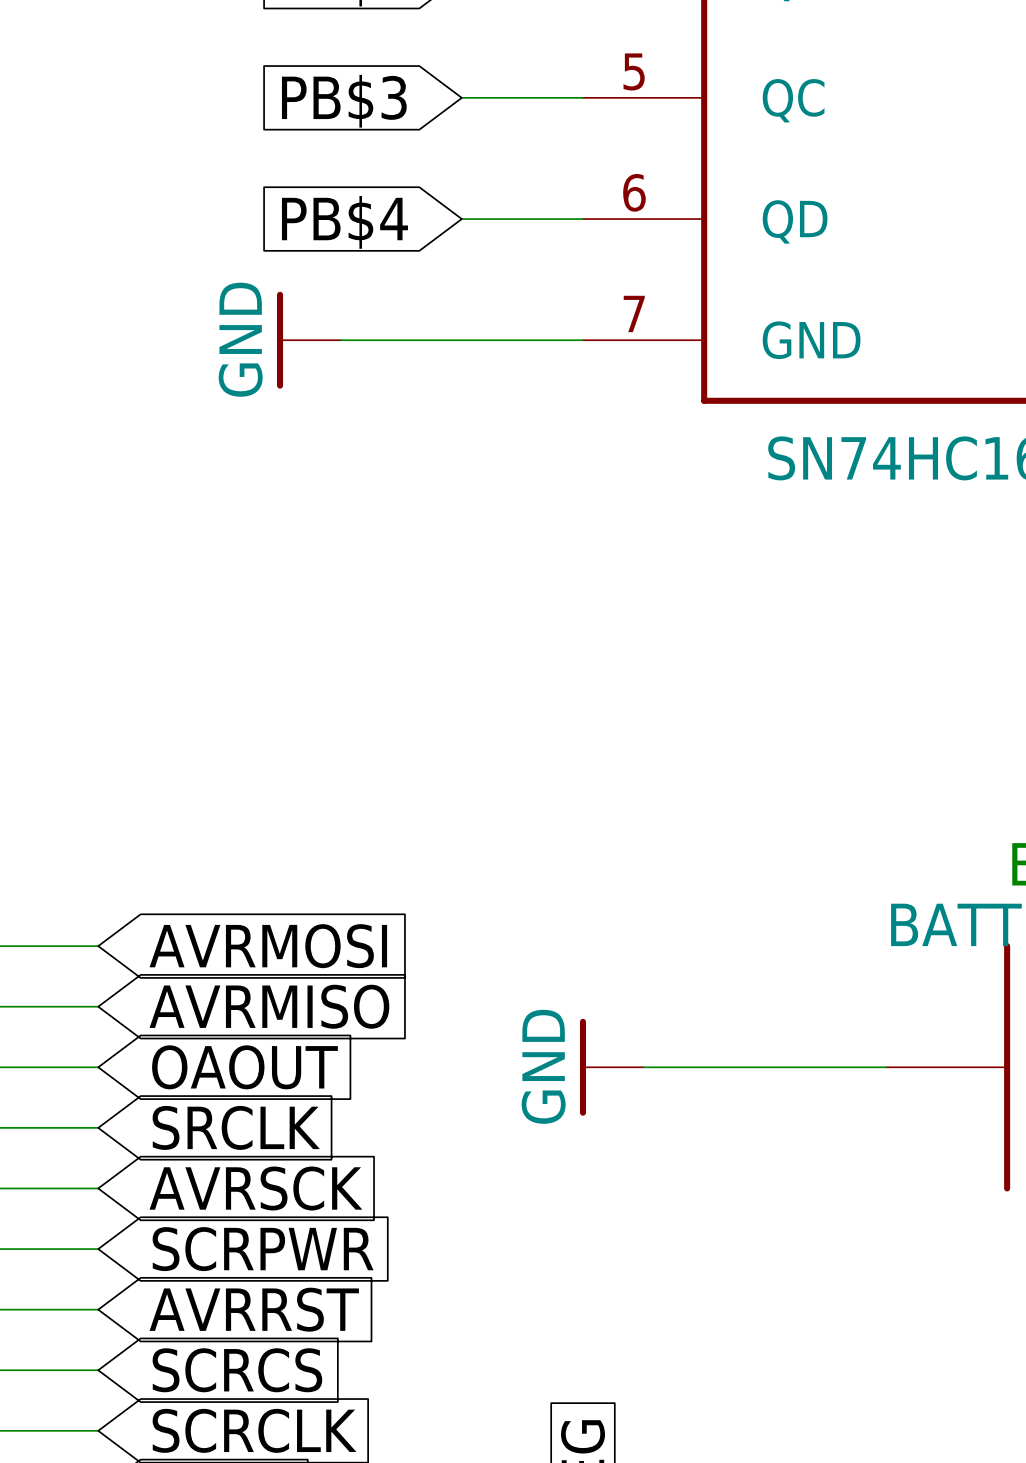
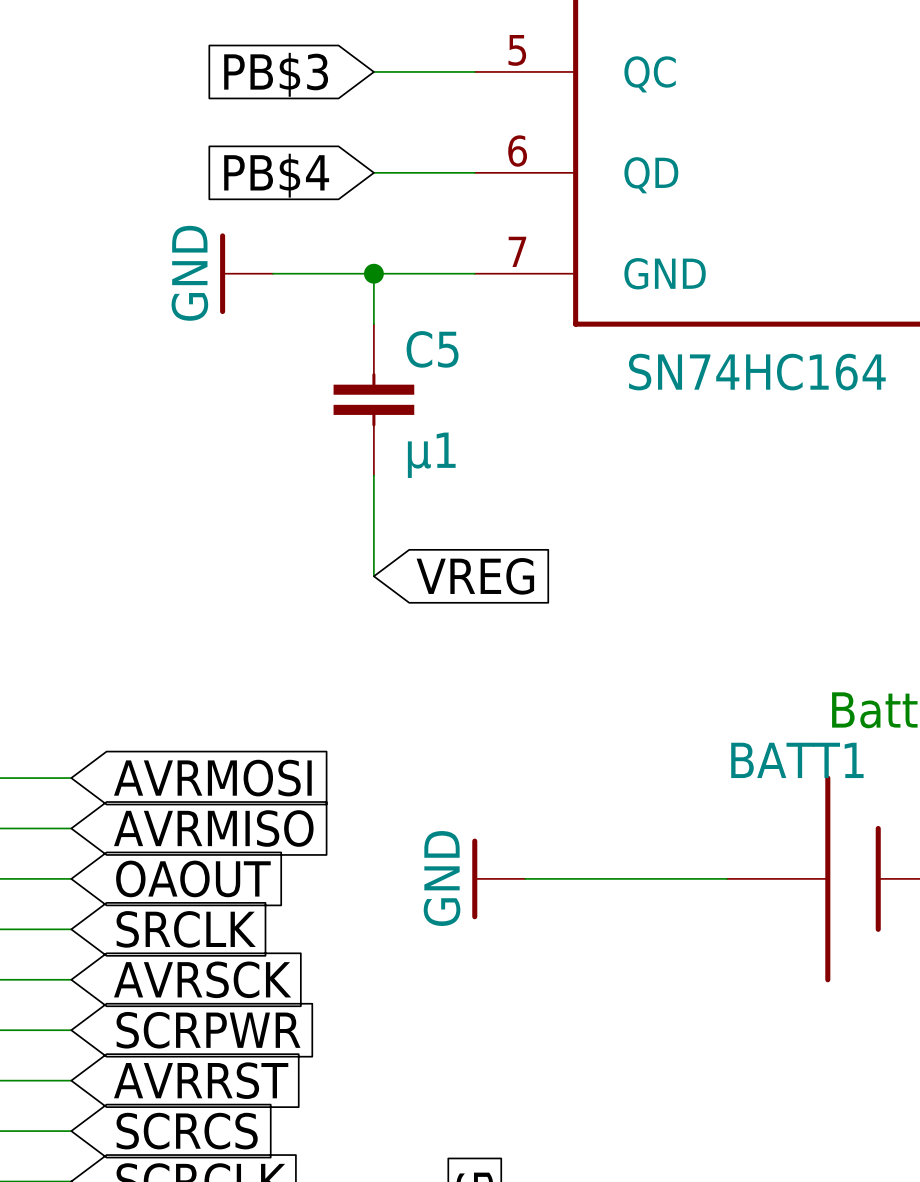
wire: none -> (373, 273) (373, 324)
junction: none -> (373, 273)
C5: none -> µ1 (373, 399)
wire: none -> (373, 475) (373, 576)
global label: none -> VREG (475, 576)

